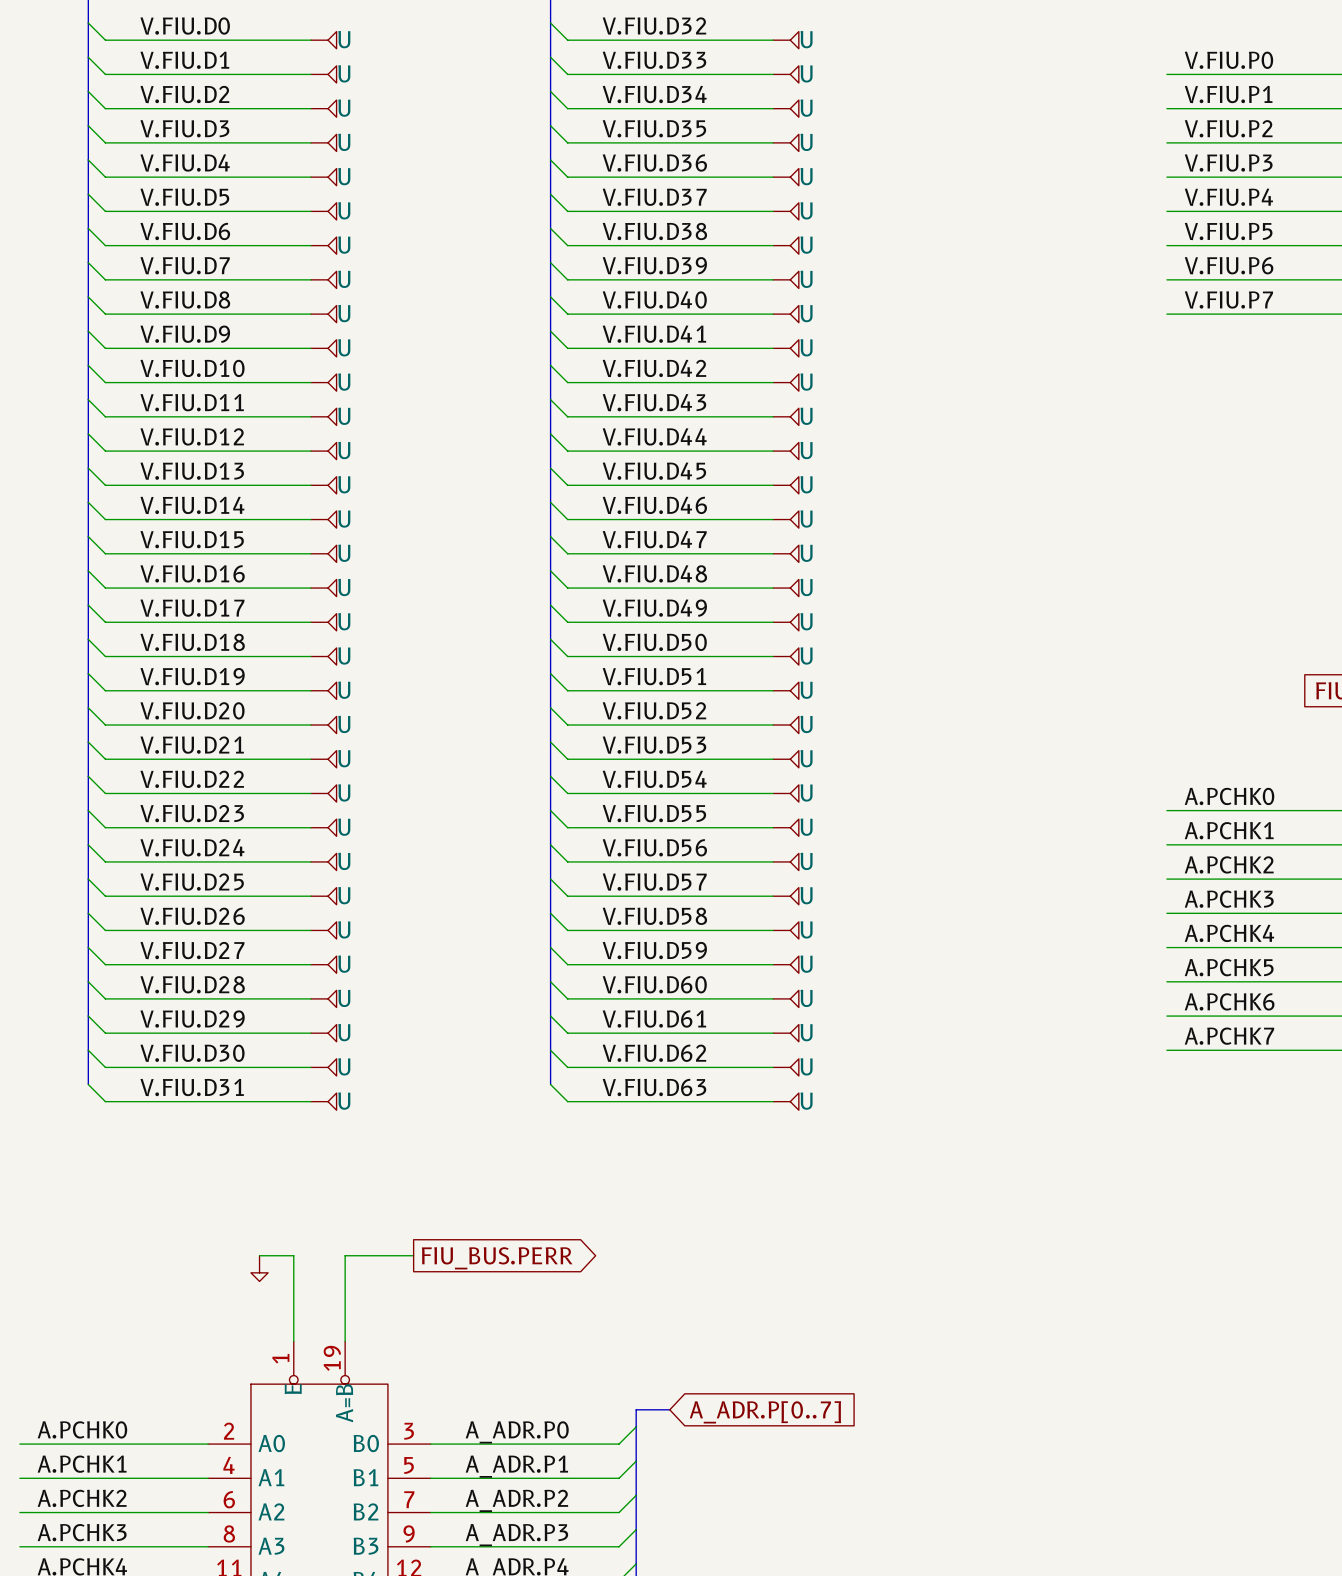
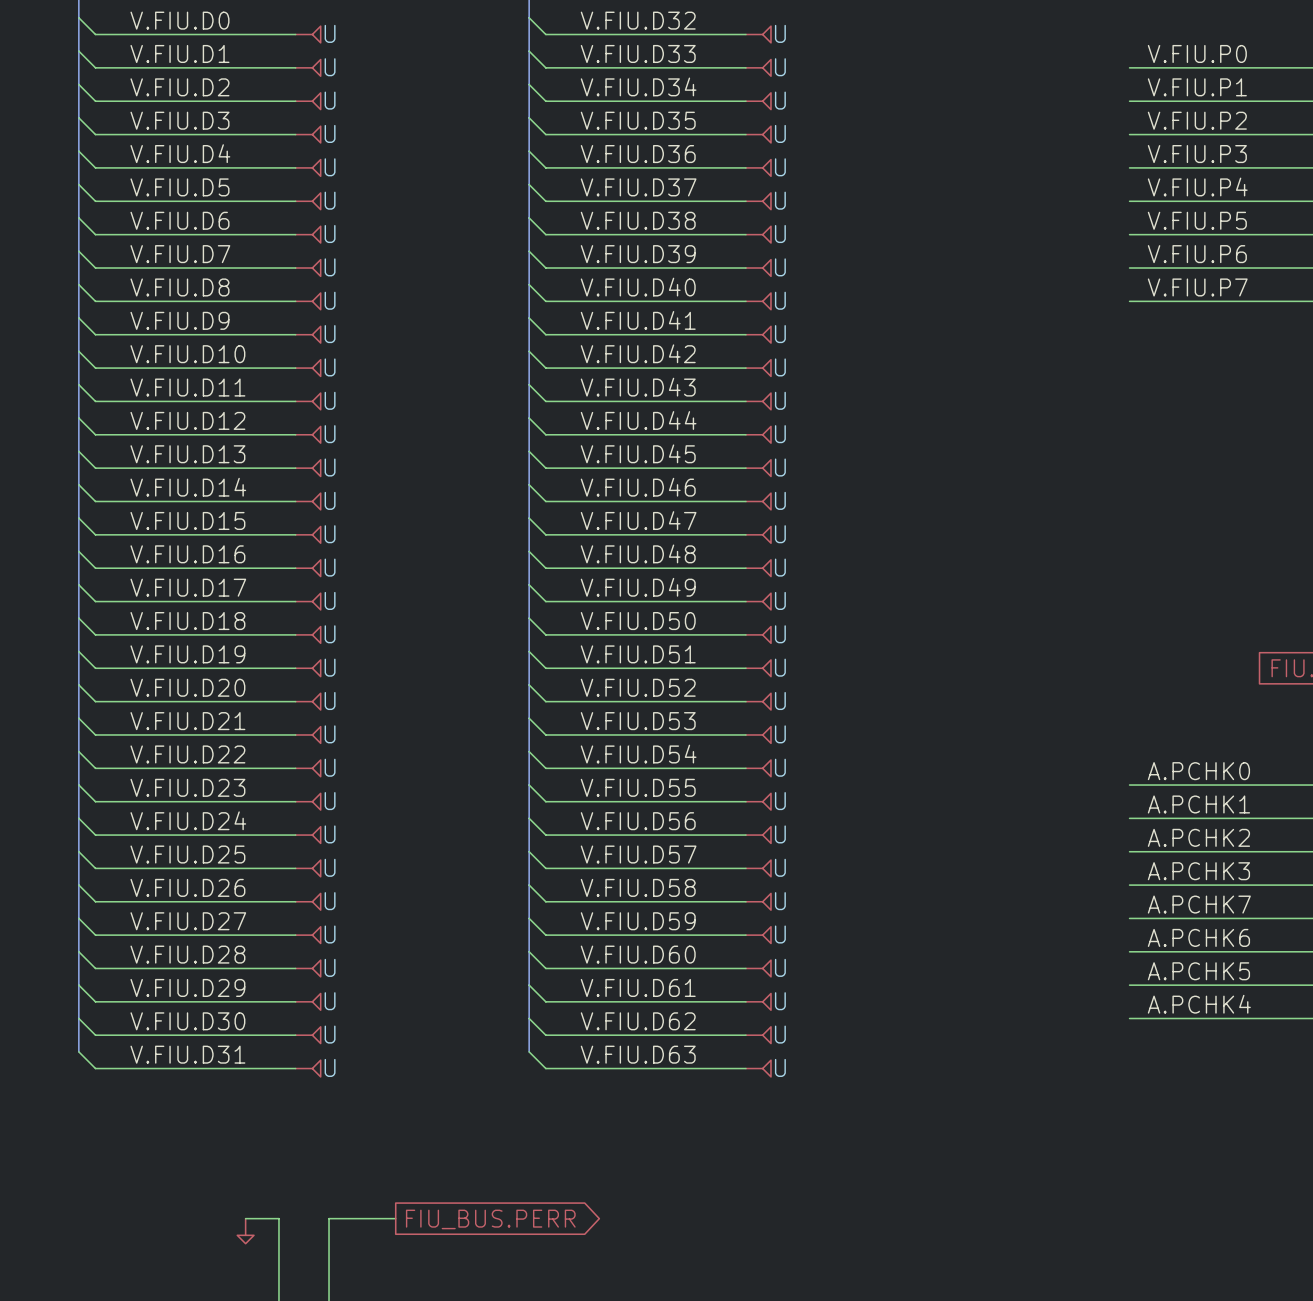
label: A.PCHK4 (1229, 933) -> A.PCHK7 (1199, 904)
label: A.PCHK5 (1229, 967) -> A.PCHK6 (1198, 937)
label: A.PCHK6 (1229, 1001) -> A.PCHK5 (1198, 971)
label: A.PCHK7 (1229, 1036) -> A.PCHK4 (1199, 1004)

